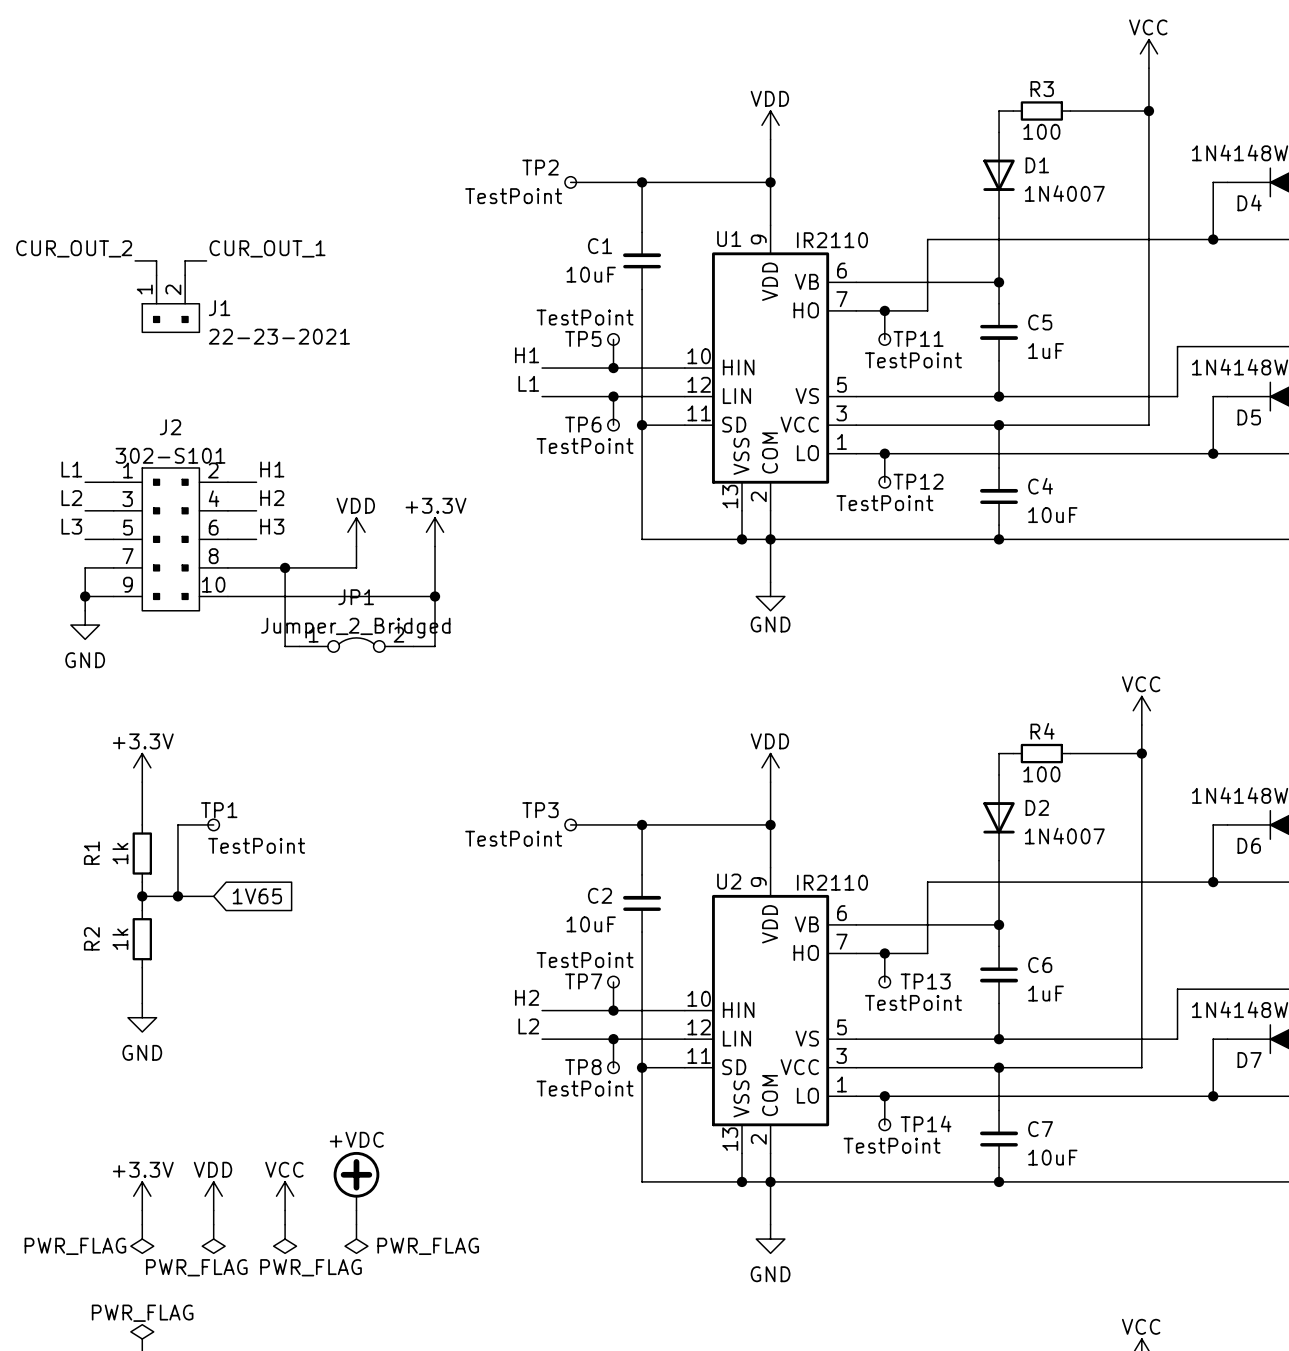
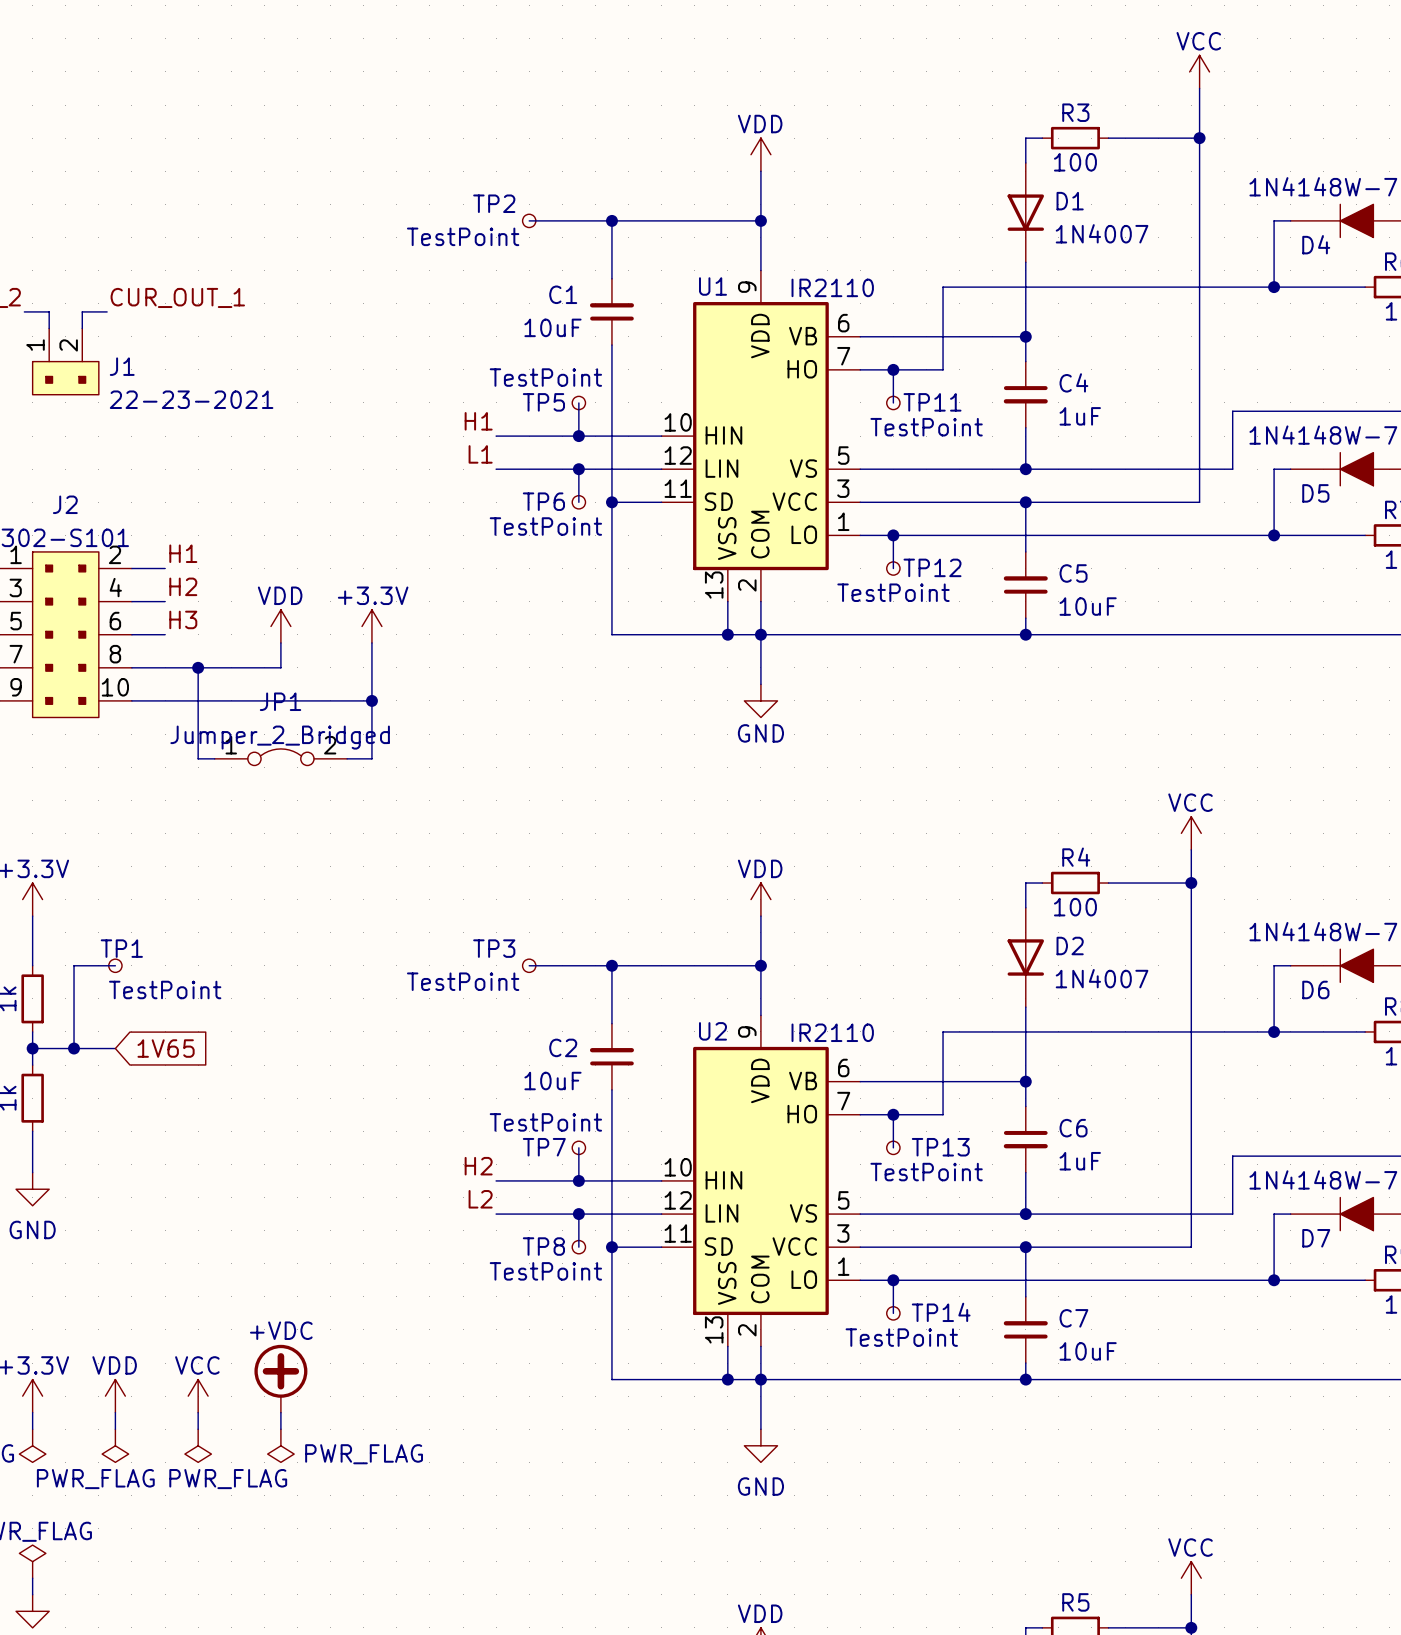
C5 name: C5 (1040, 322) -> C4 (1073, 382)
C4 name: C4 (1040, 486) -> C5 (1073, 573)

